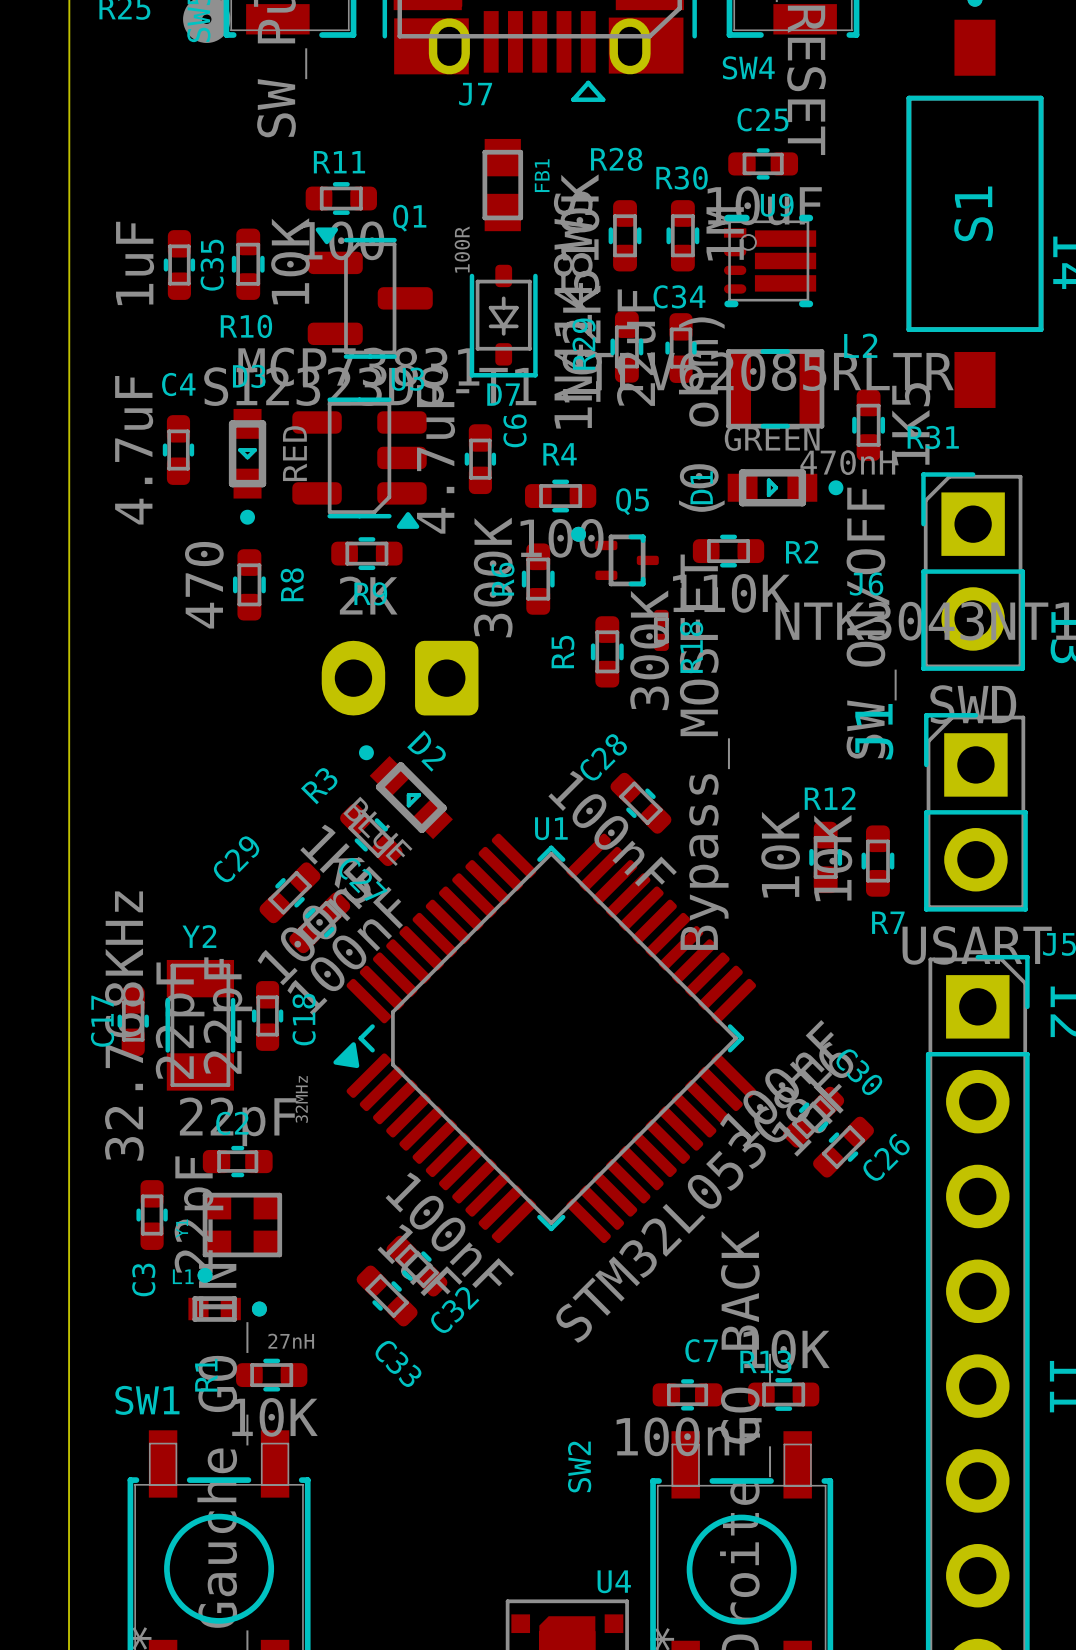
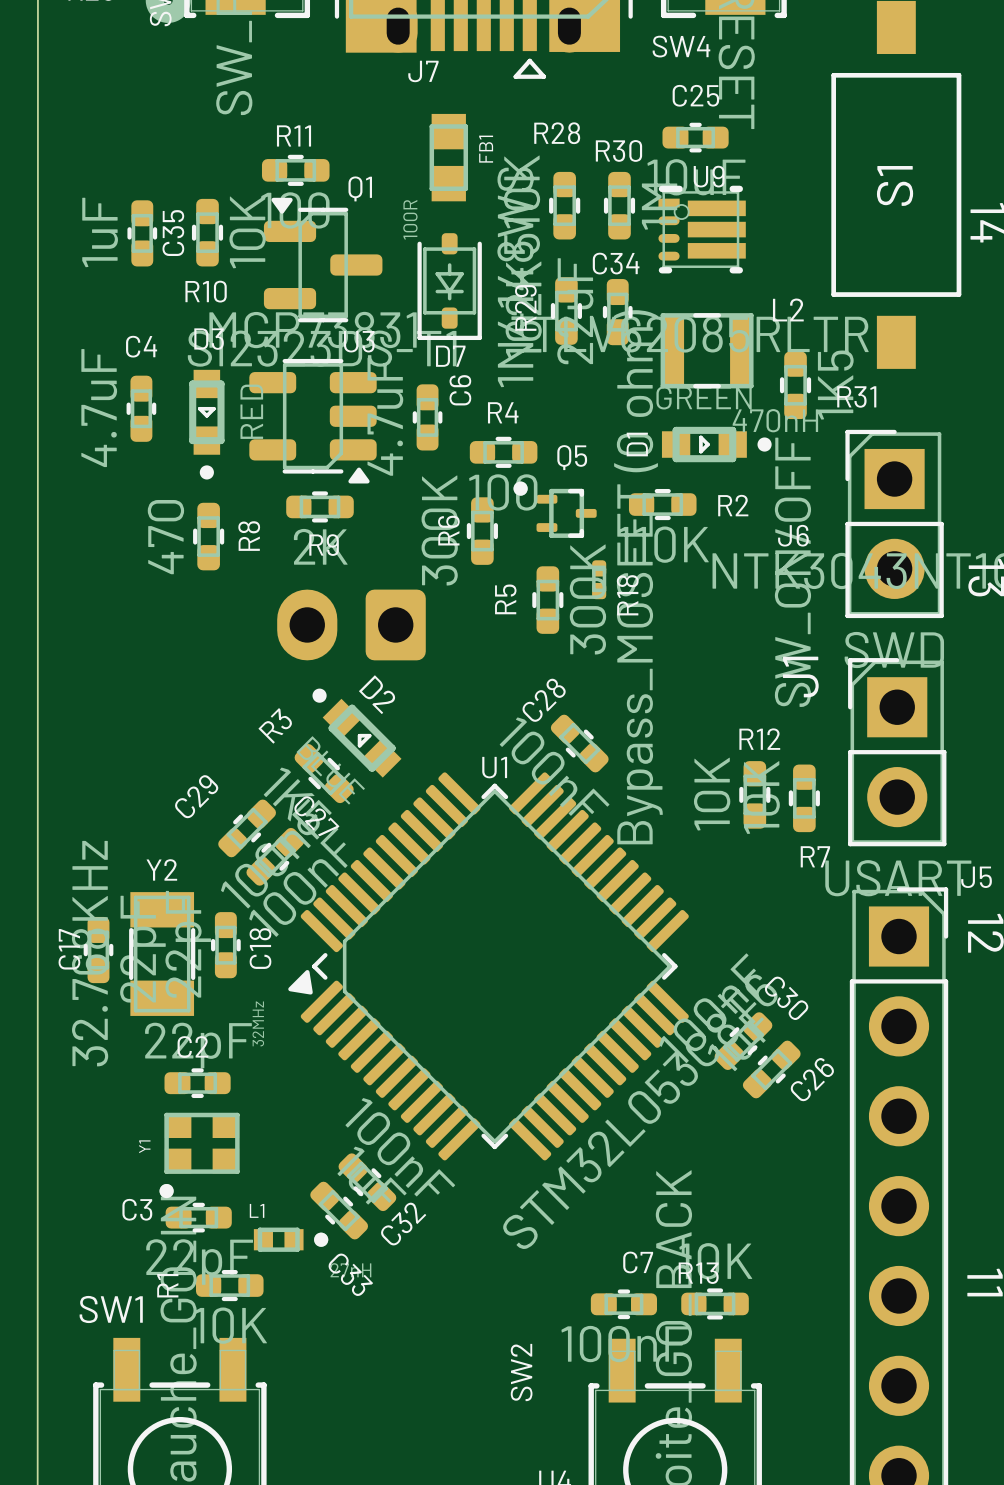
C3 rotation: 0° (152, 1215) -> 90° clockwise (198, 1217)
C3 position: (152, 1215) -> (198, 1217)
L1 name position: L1 (183, 1276) -> L1 (257, 1210)
L1 position: (227, 1309) -> (291, 1239)

